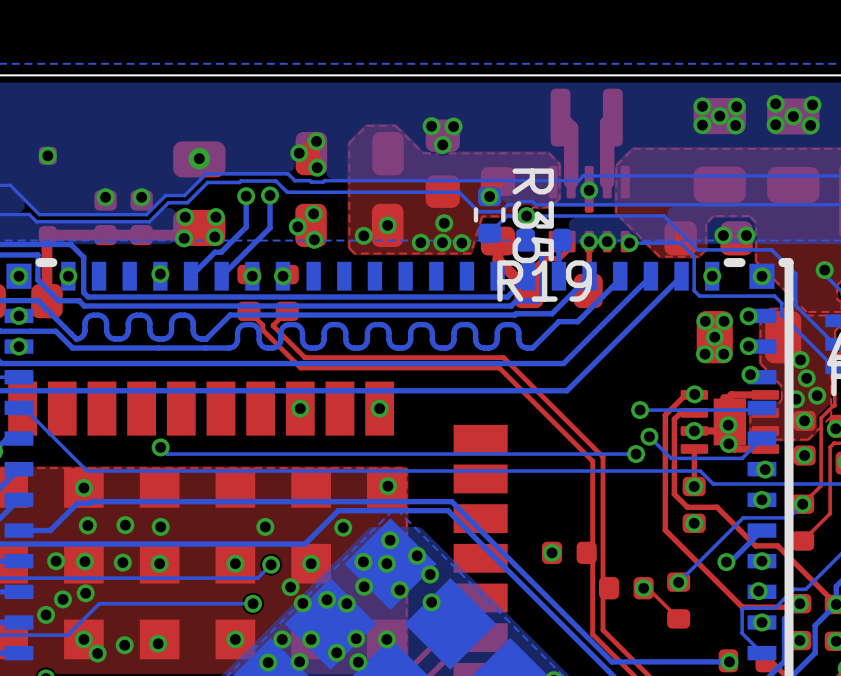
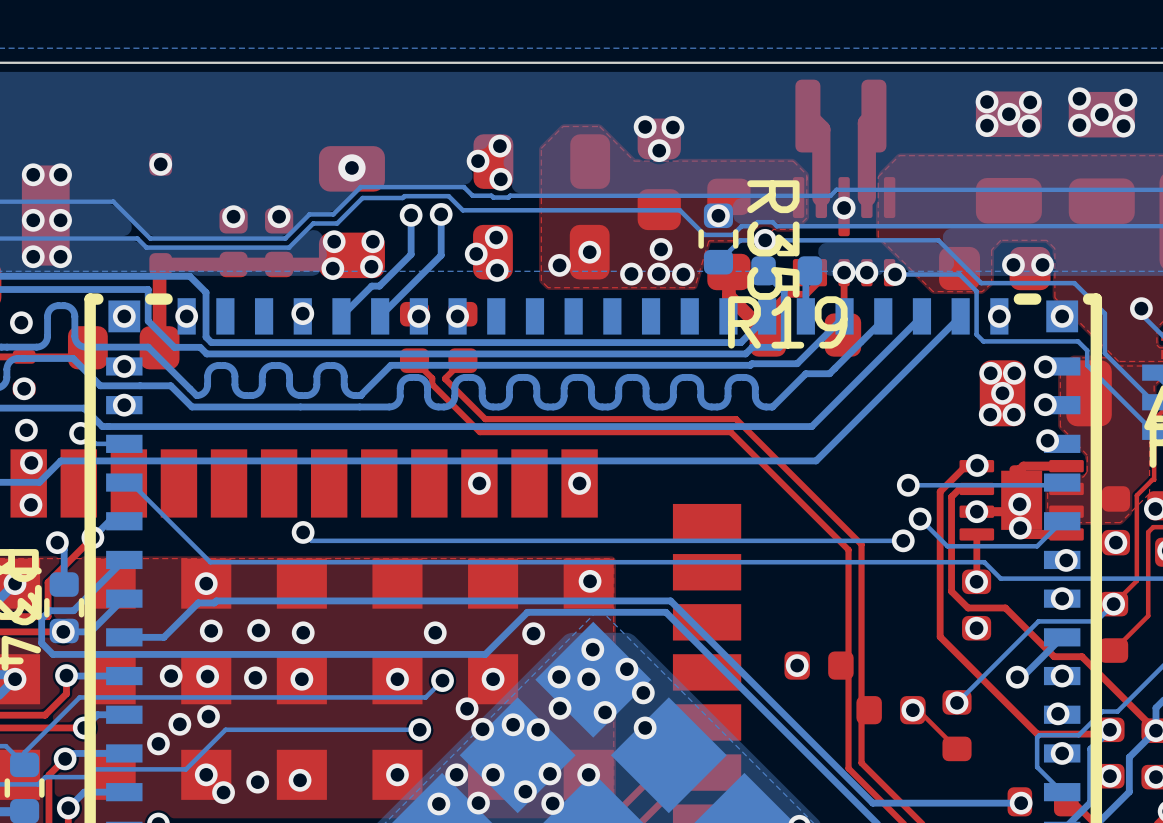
via: (800, 359) -> none
via: (806, 378) -> none
via: (817, 395) -> none
via: (796, 399) -> none
via: (804, 420) -> none

